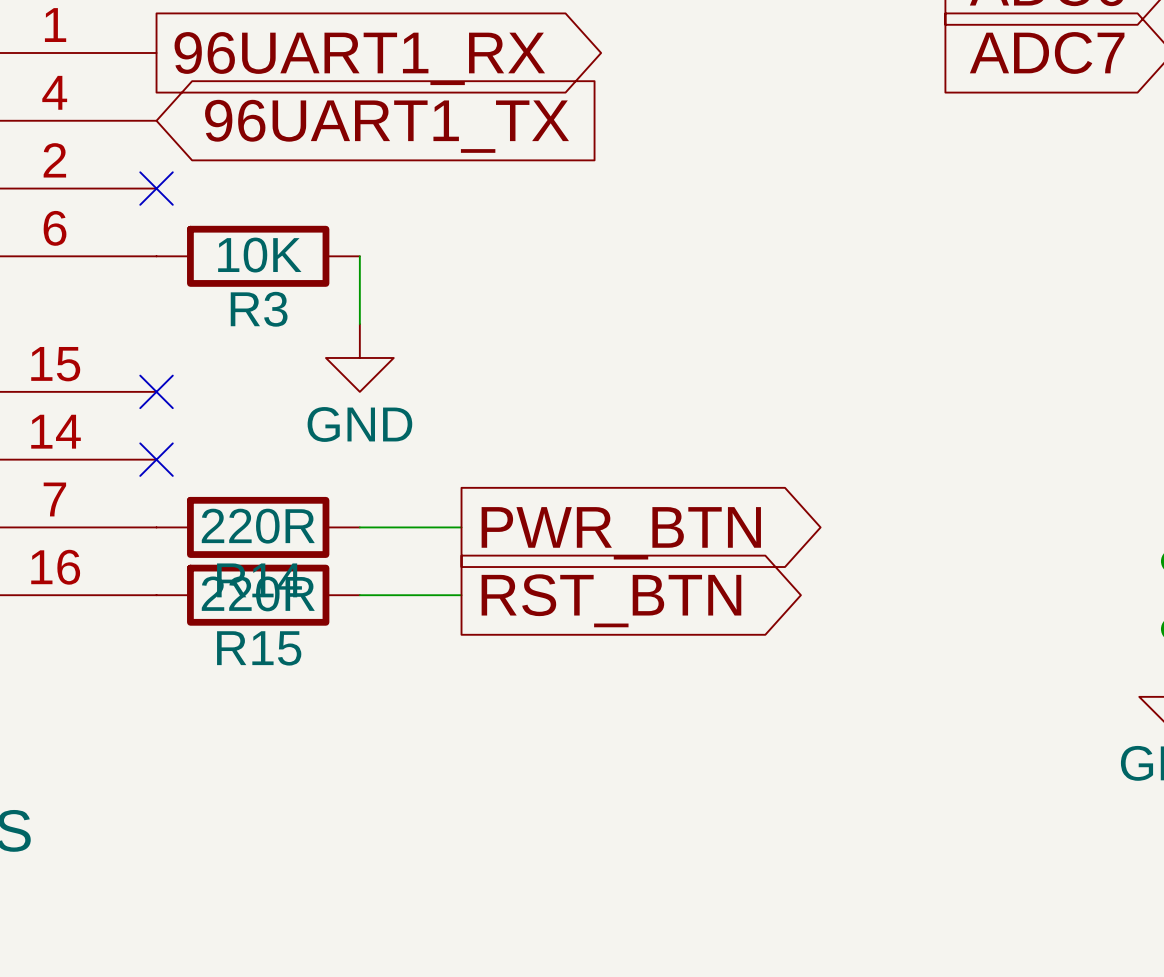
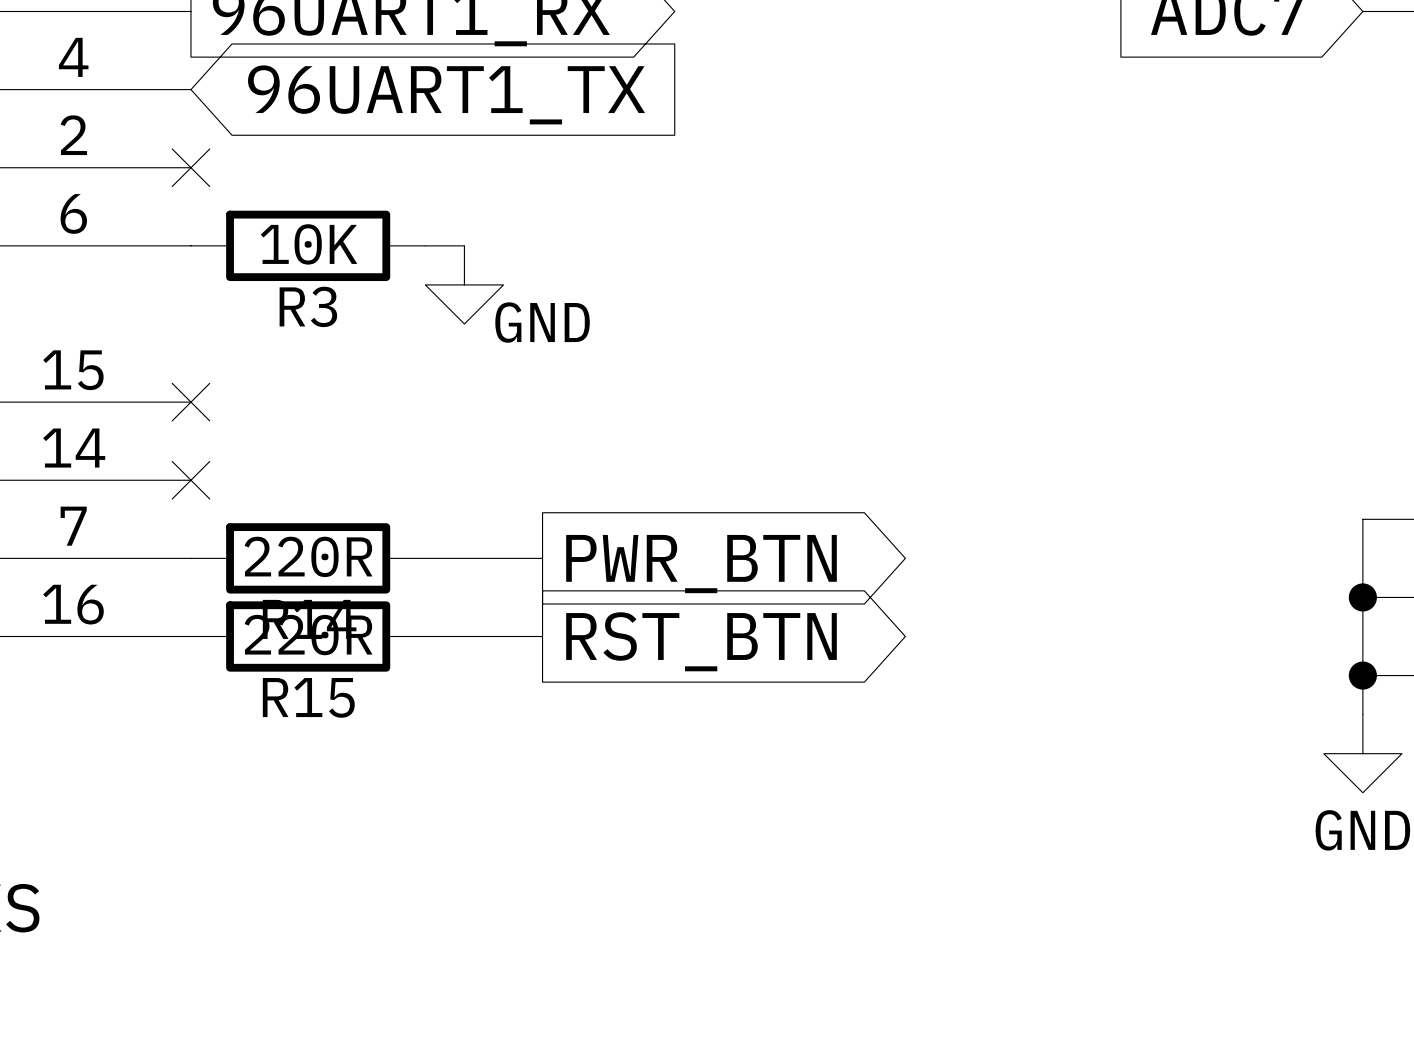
wire: (359, 256) (359, 324) -> (425, 245) (464, 245)
power symbol position: GND (359, 357) -> GND (464, 284)
power symbol text position: GND (359, 424) -> GND (542, 322)

